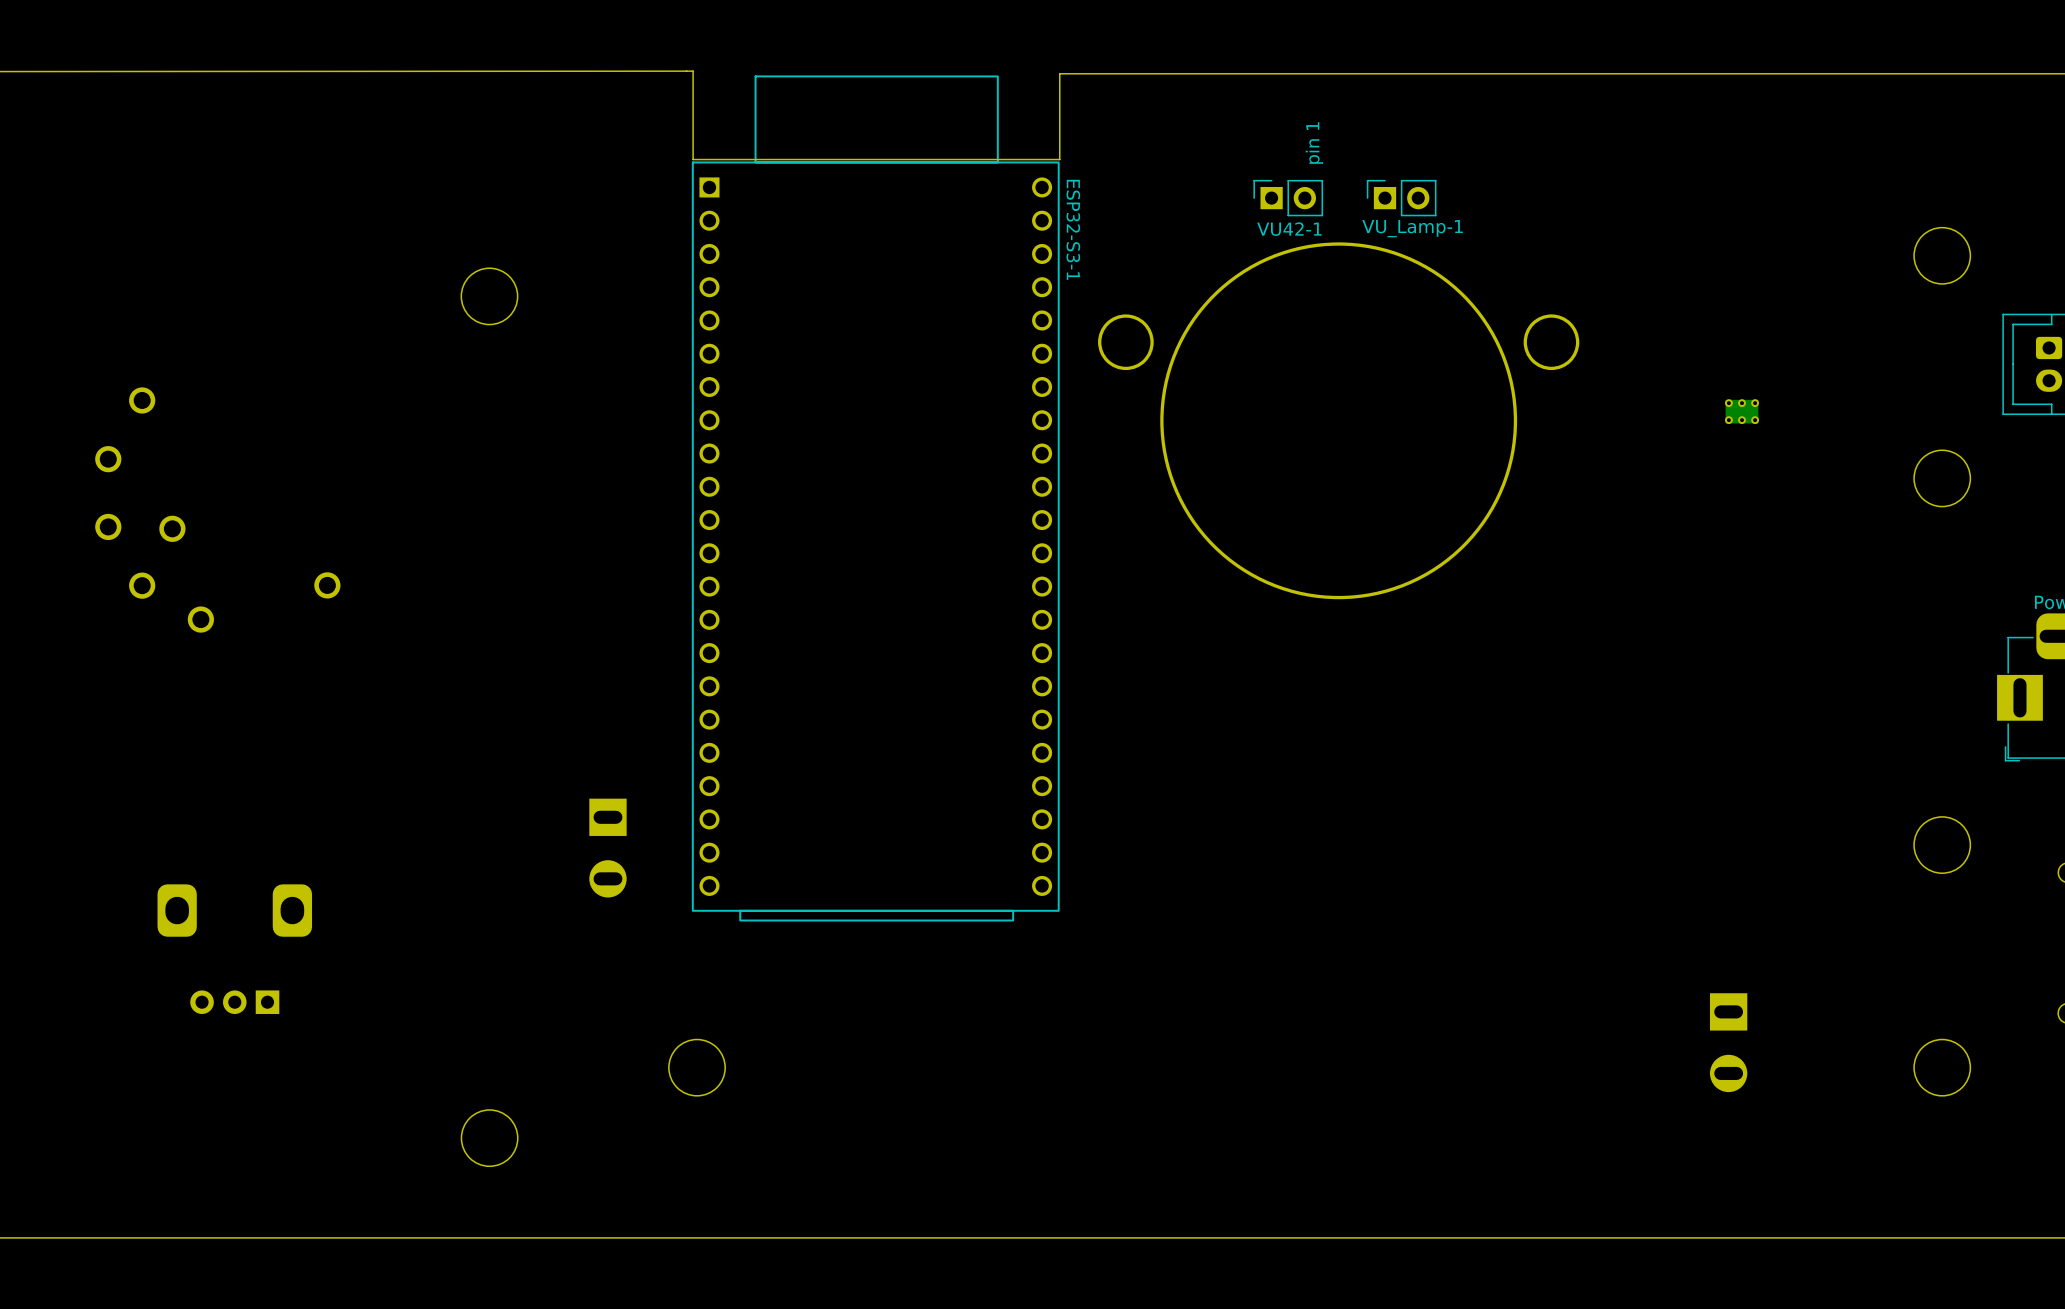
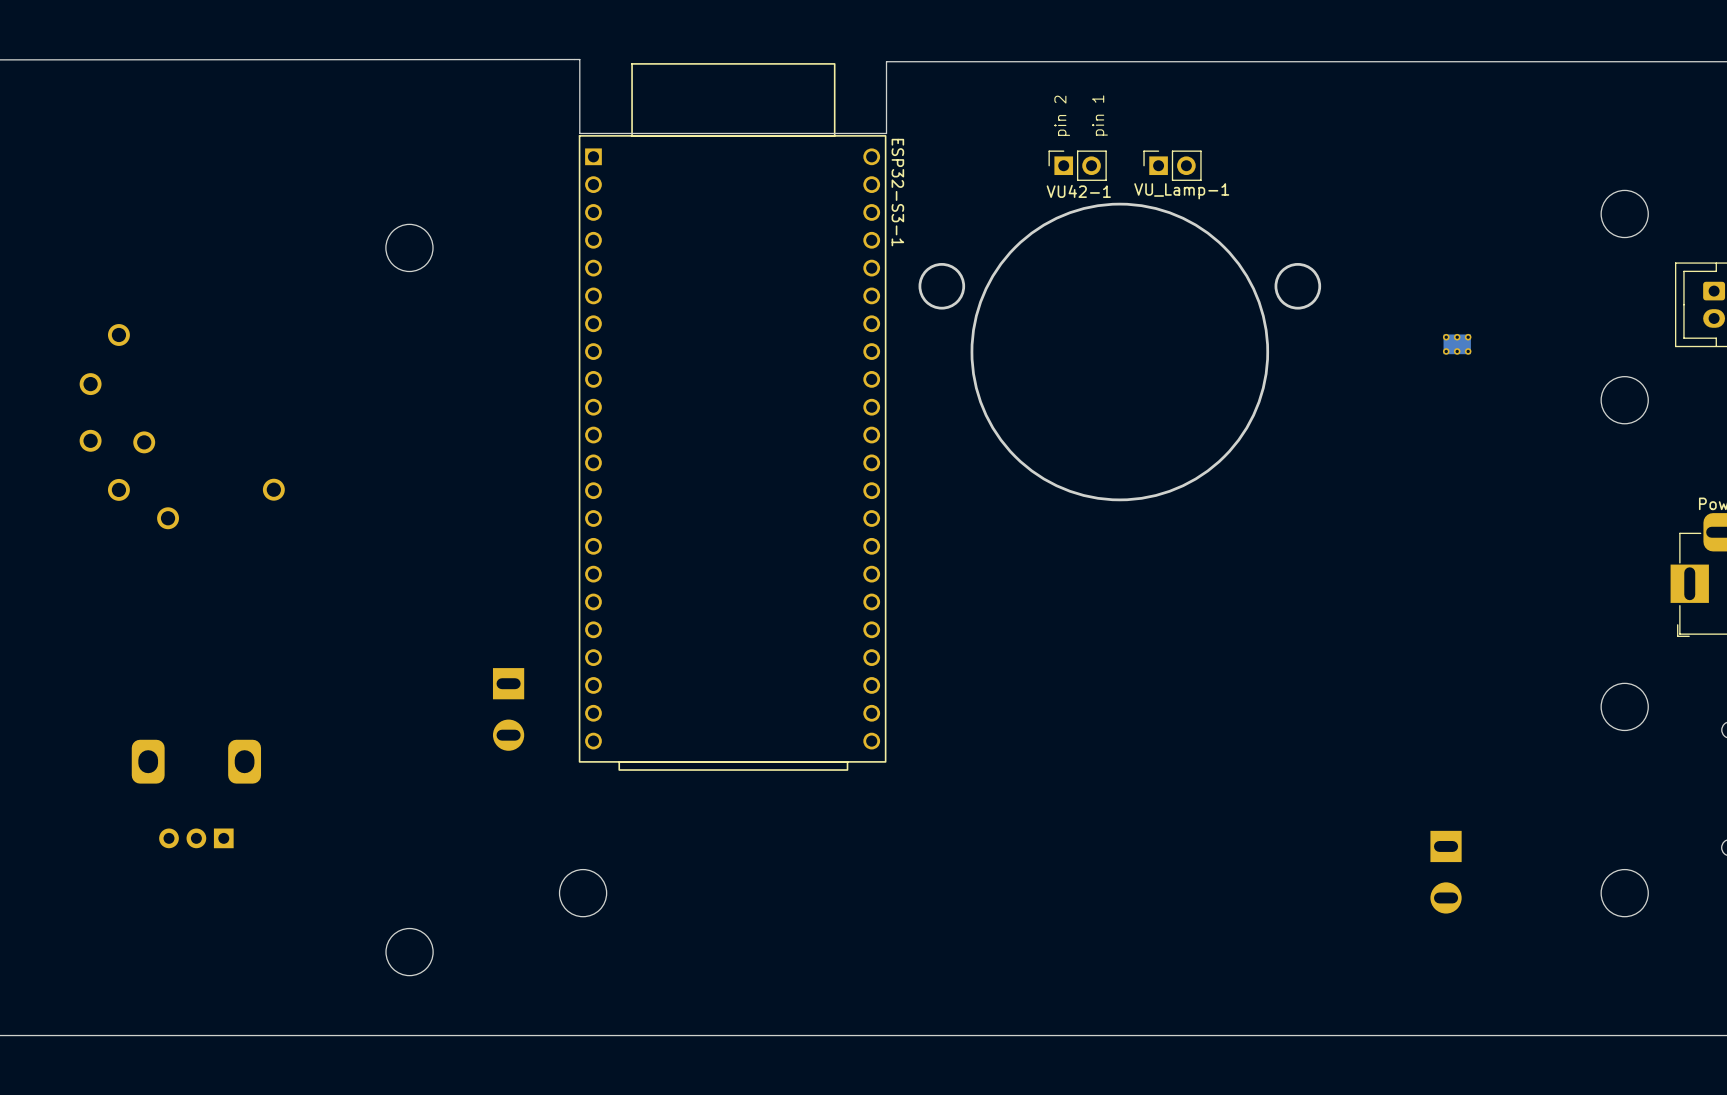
text: none -> pin 2 (1062, 115)

